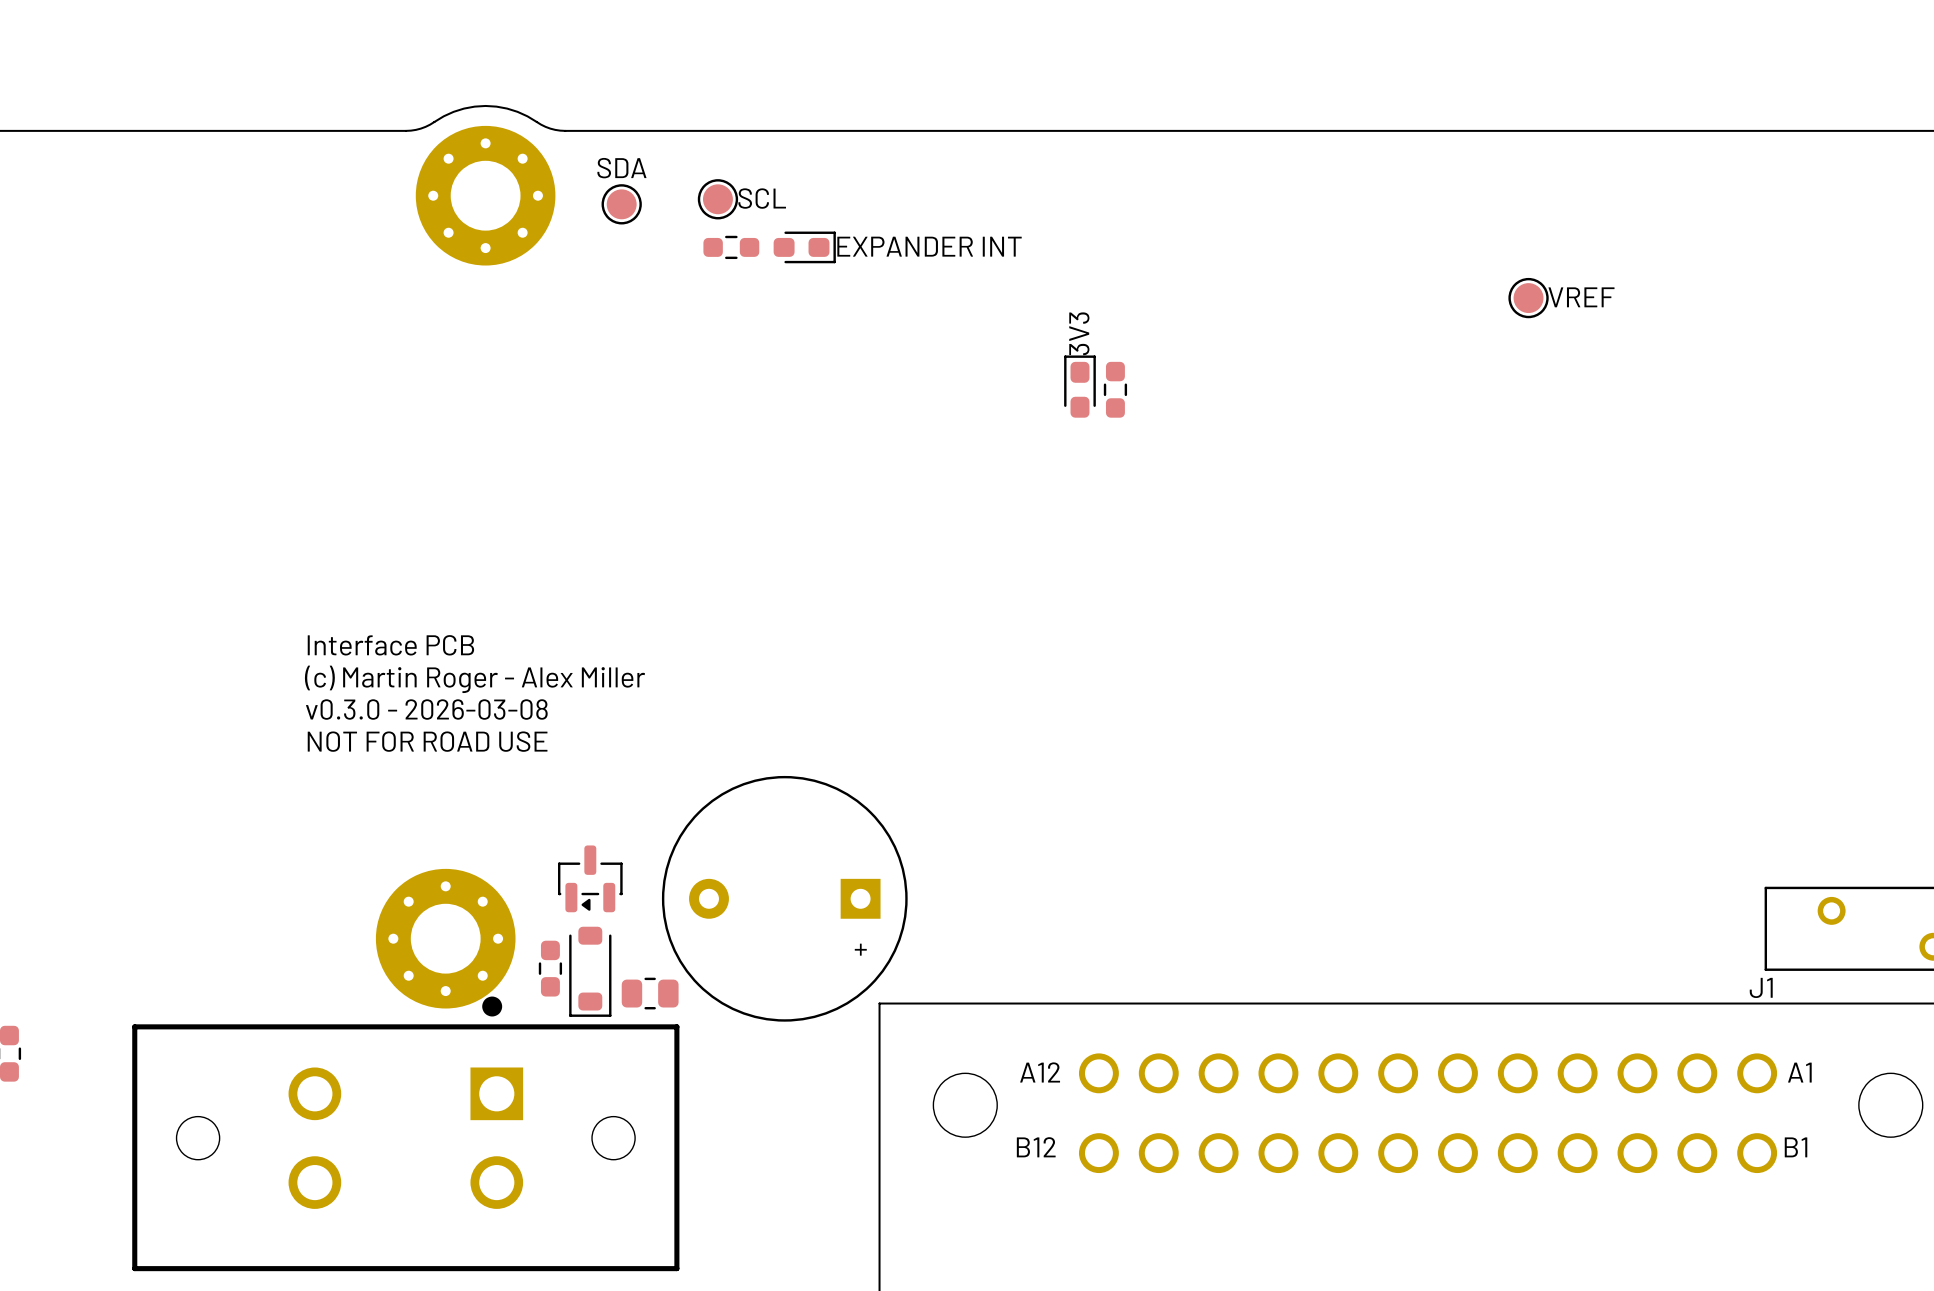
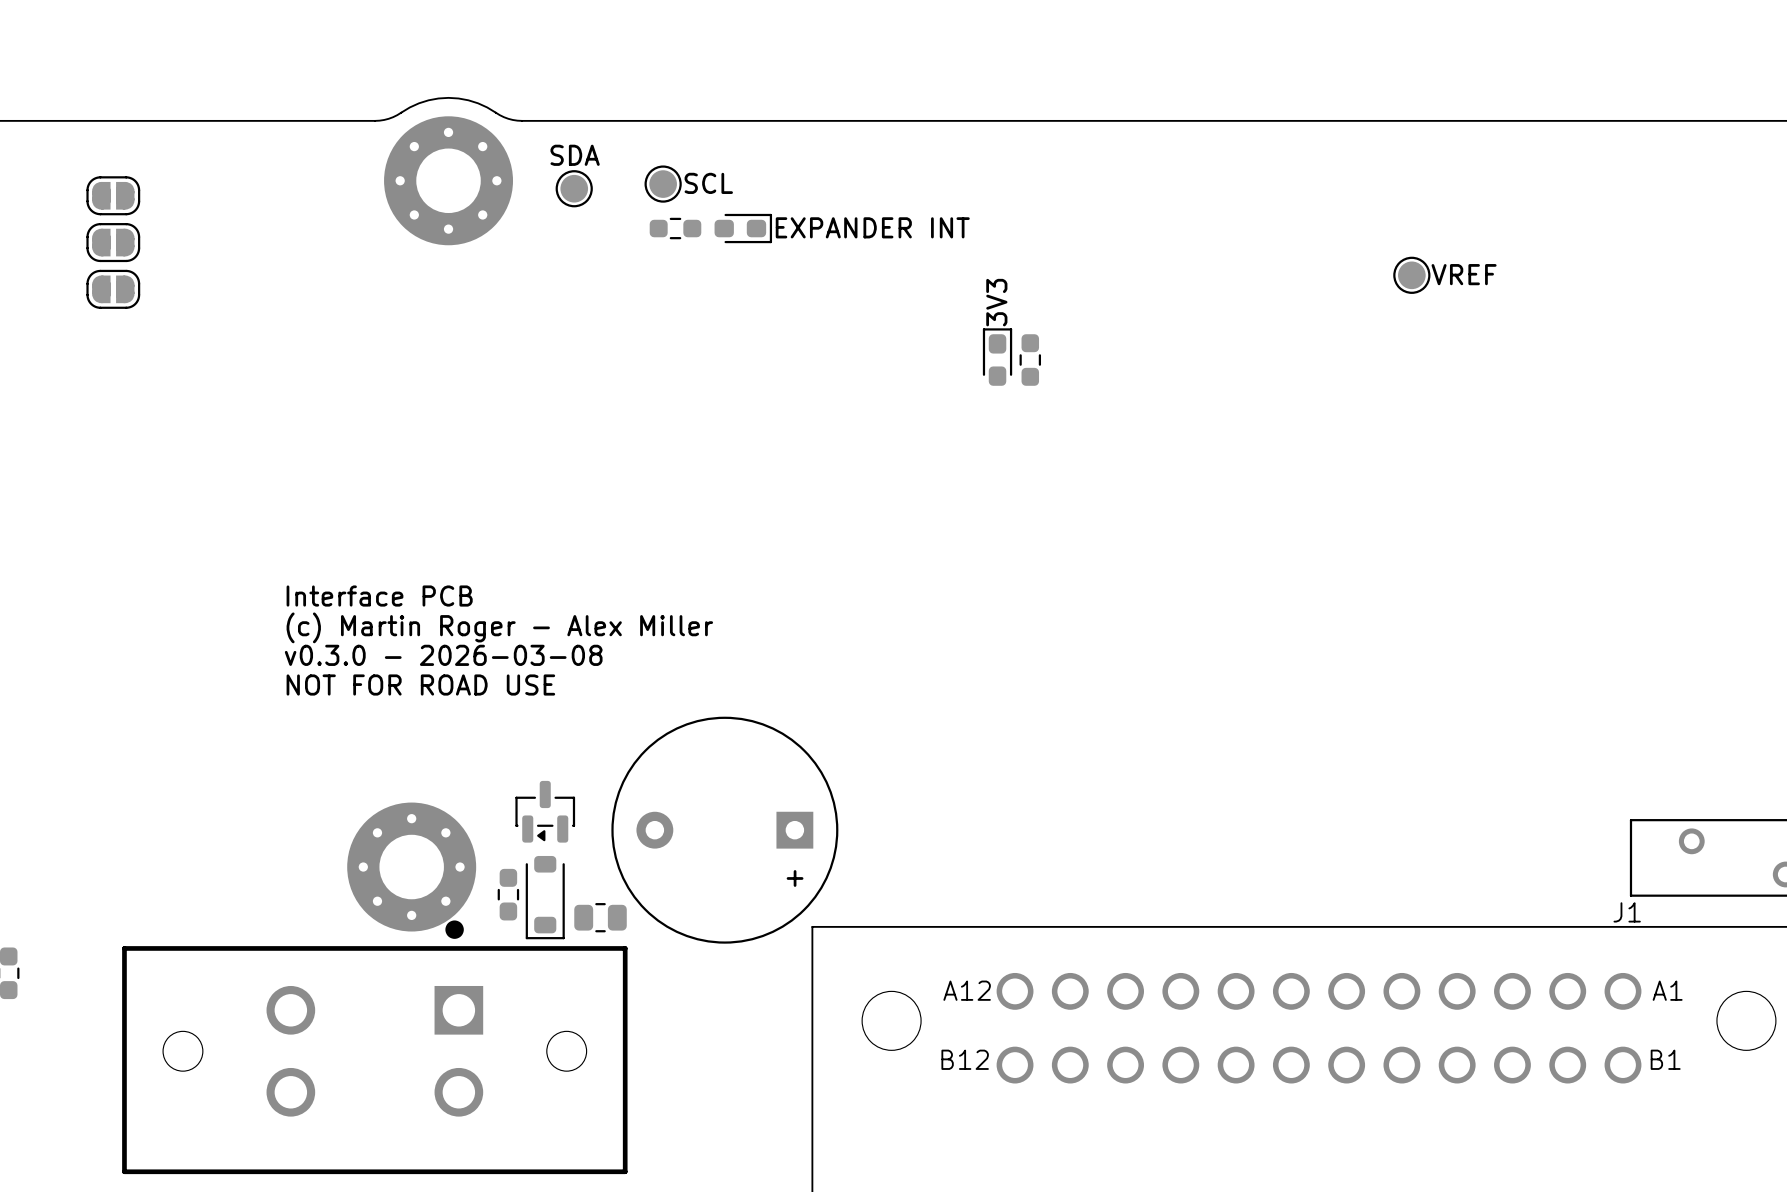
part: none -> (113, 195)
part: none -> (113, 242)
part: none -> (113, 289)

